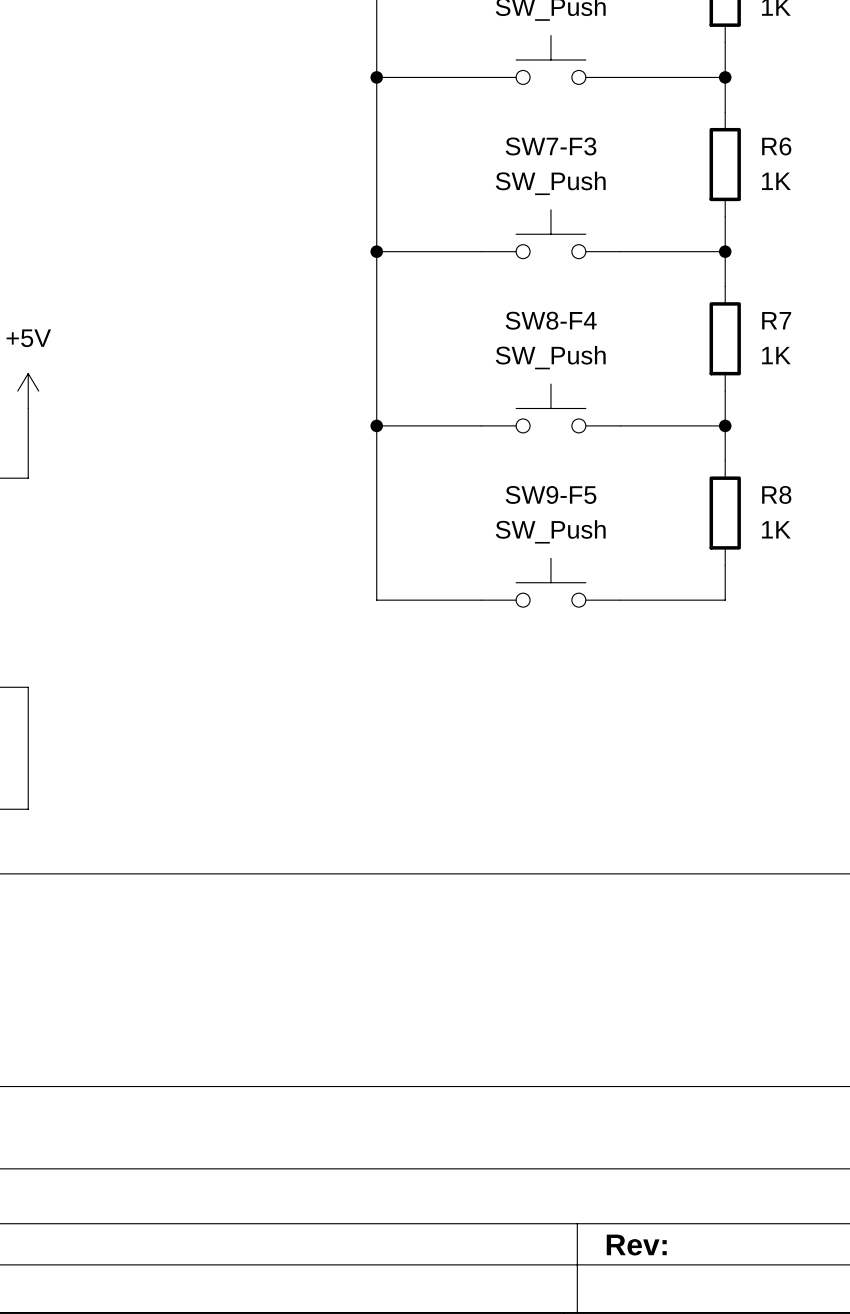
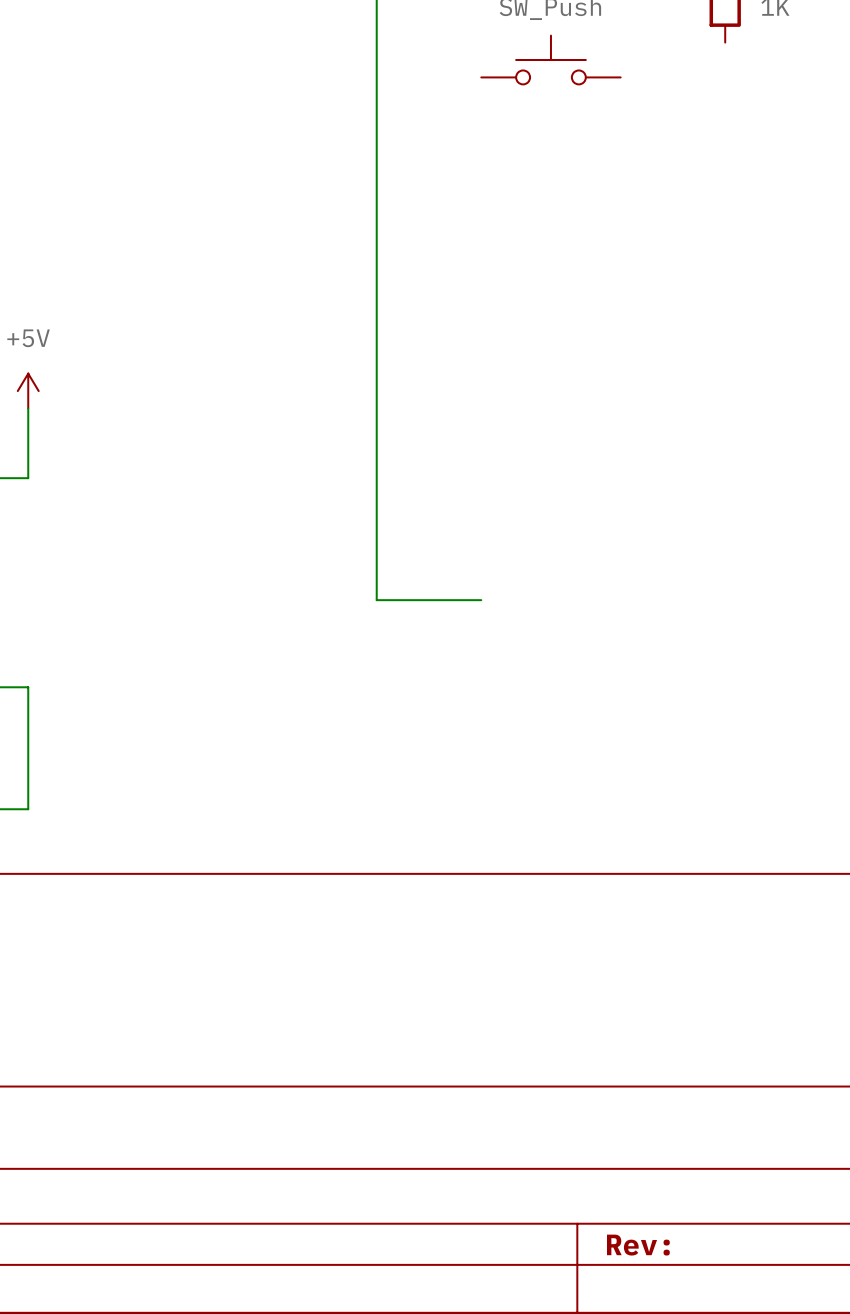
wire: (725, 42) (725, 112) -> none
wire: (376, 77) (481, 77) -> none
junction: (376, 77) -> none
wire: (620, 77) (725, 77) -> none
junction: (725, 77) -> none
R6: 1K (725, 164) -> none
wire: (725, 216) (725, 286) -> none
SW7-F3: SW_Push (550, 234) -> none
wire: (376, 251) (481, 251) -> none
junction: (376, 251) -> none
wire: (620, 251) (725, 251) -> none
junction: (725, 251) -> none
R7: 1K (725, 338) -> none
wire: (725, 391) (725, 460) -> none
SW8-F4: SW_Push (550, 408) -> none
wire: (376, 425) (481, 425) -> none
junction: (376, 425) -> none
wire: (620, 425) (725, 425) -> none
junction: (725, 425) -> none
R8: 1K (725, 513) -> none
wire: (725, 565) (725, 600) (620, 600) -> none
SW9-F5: SW_Push (550, 582) -> none

